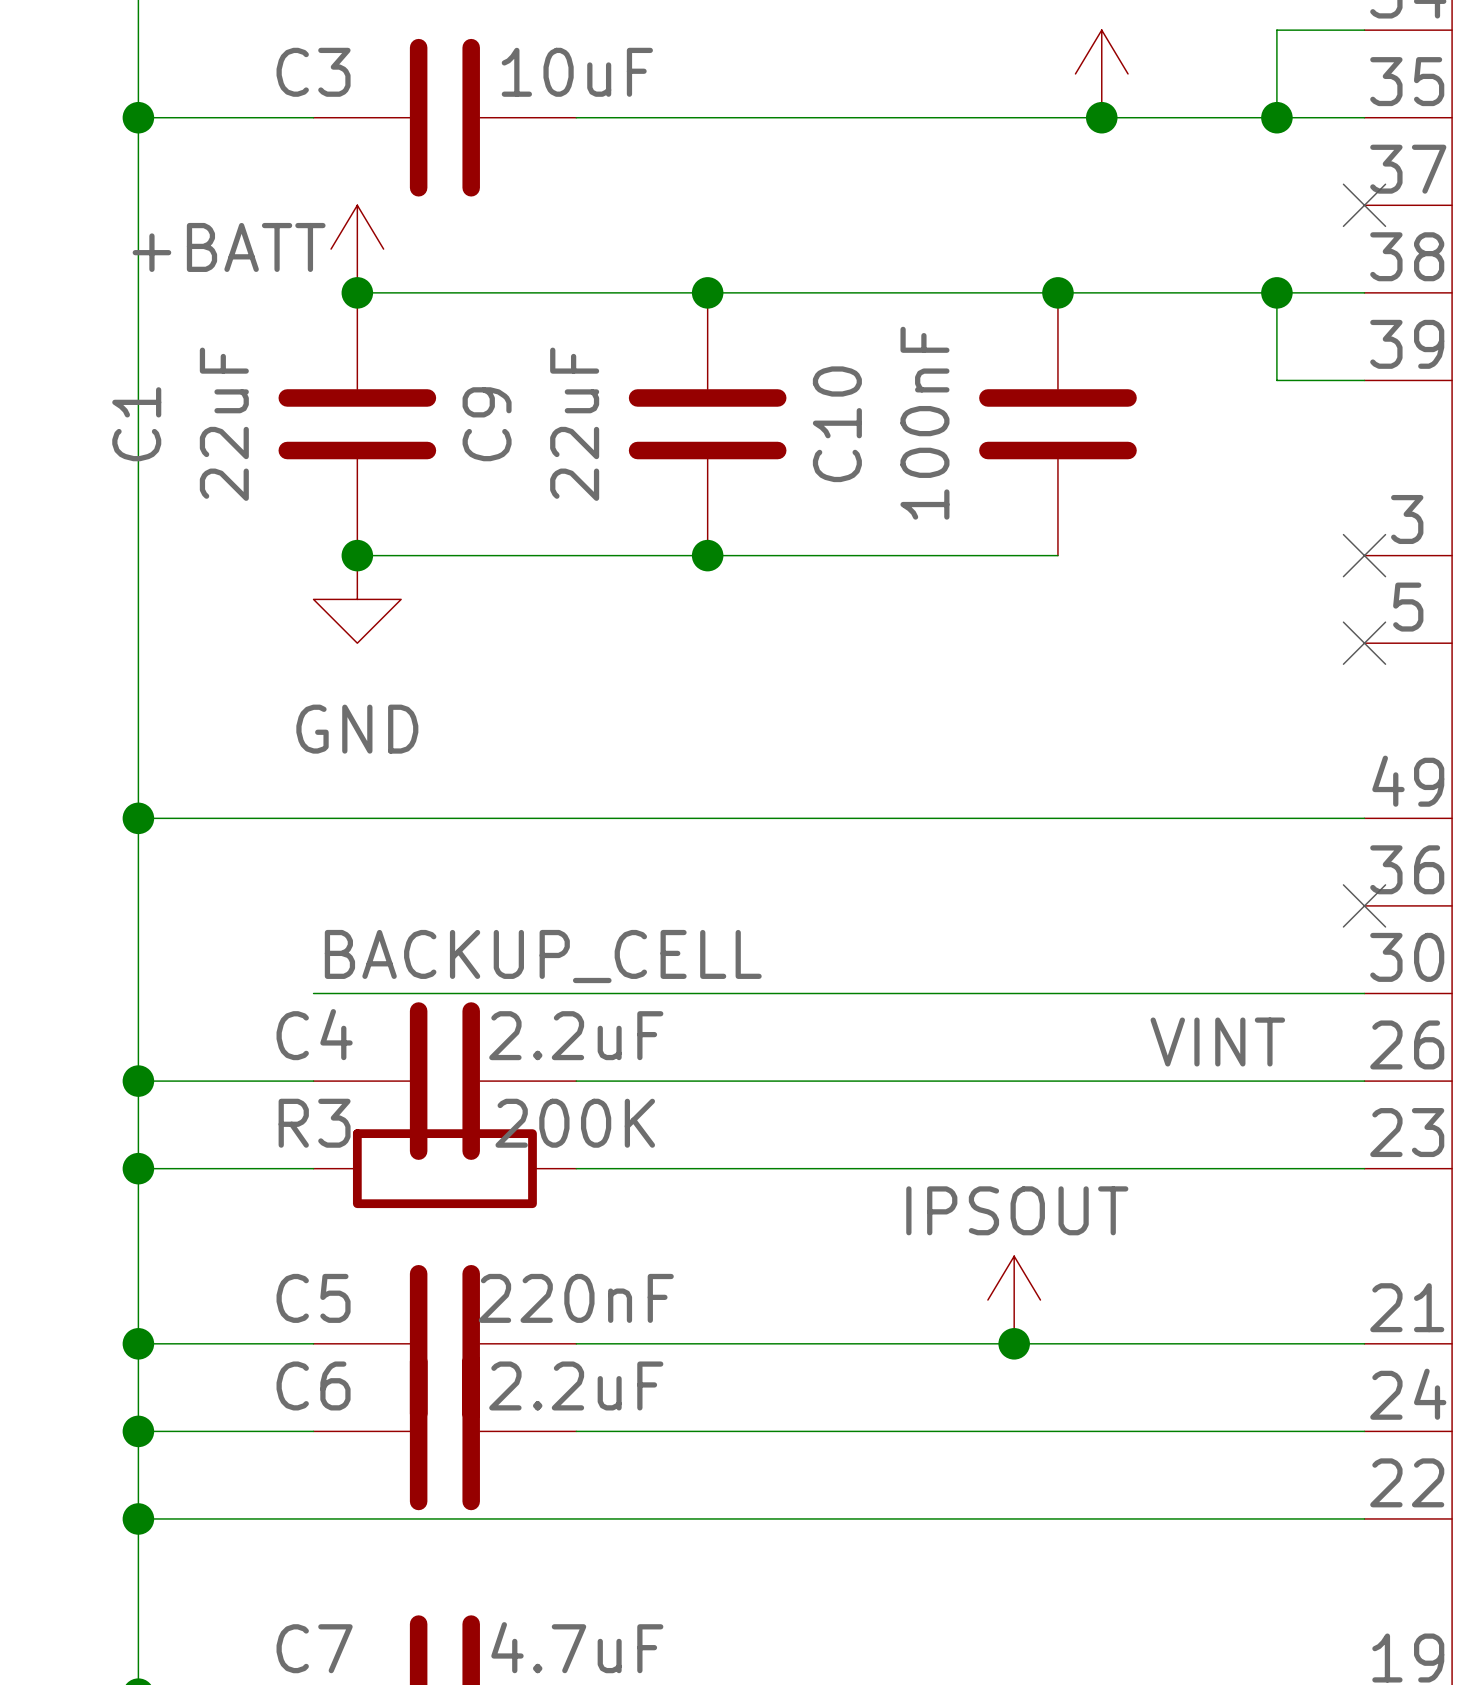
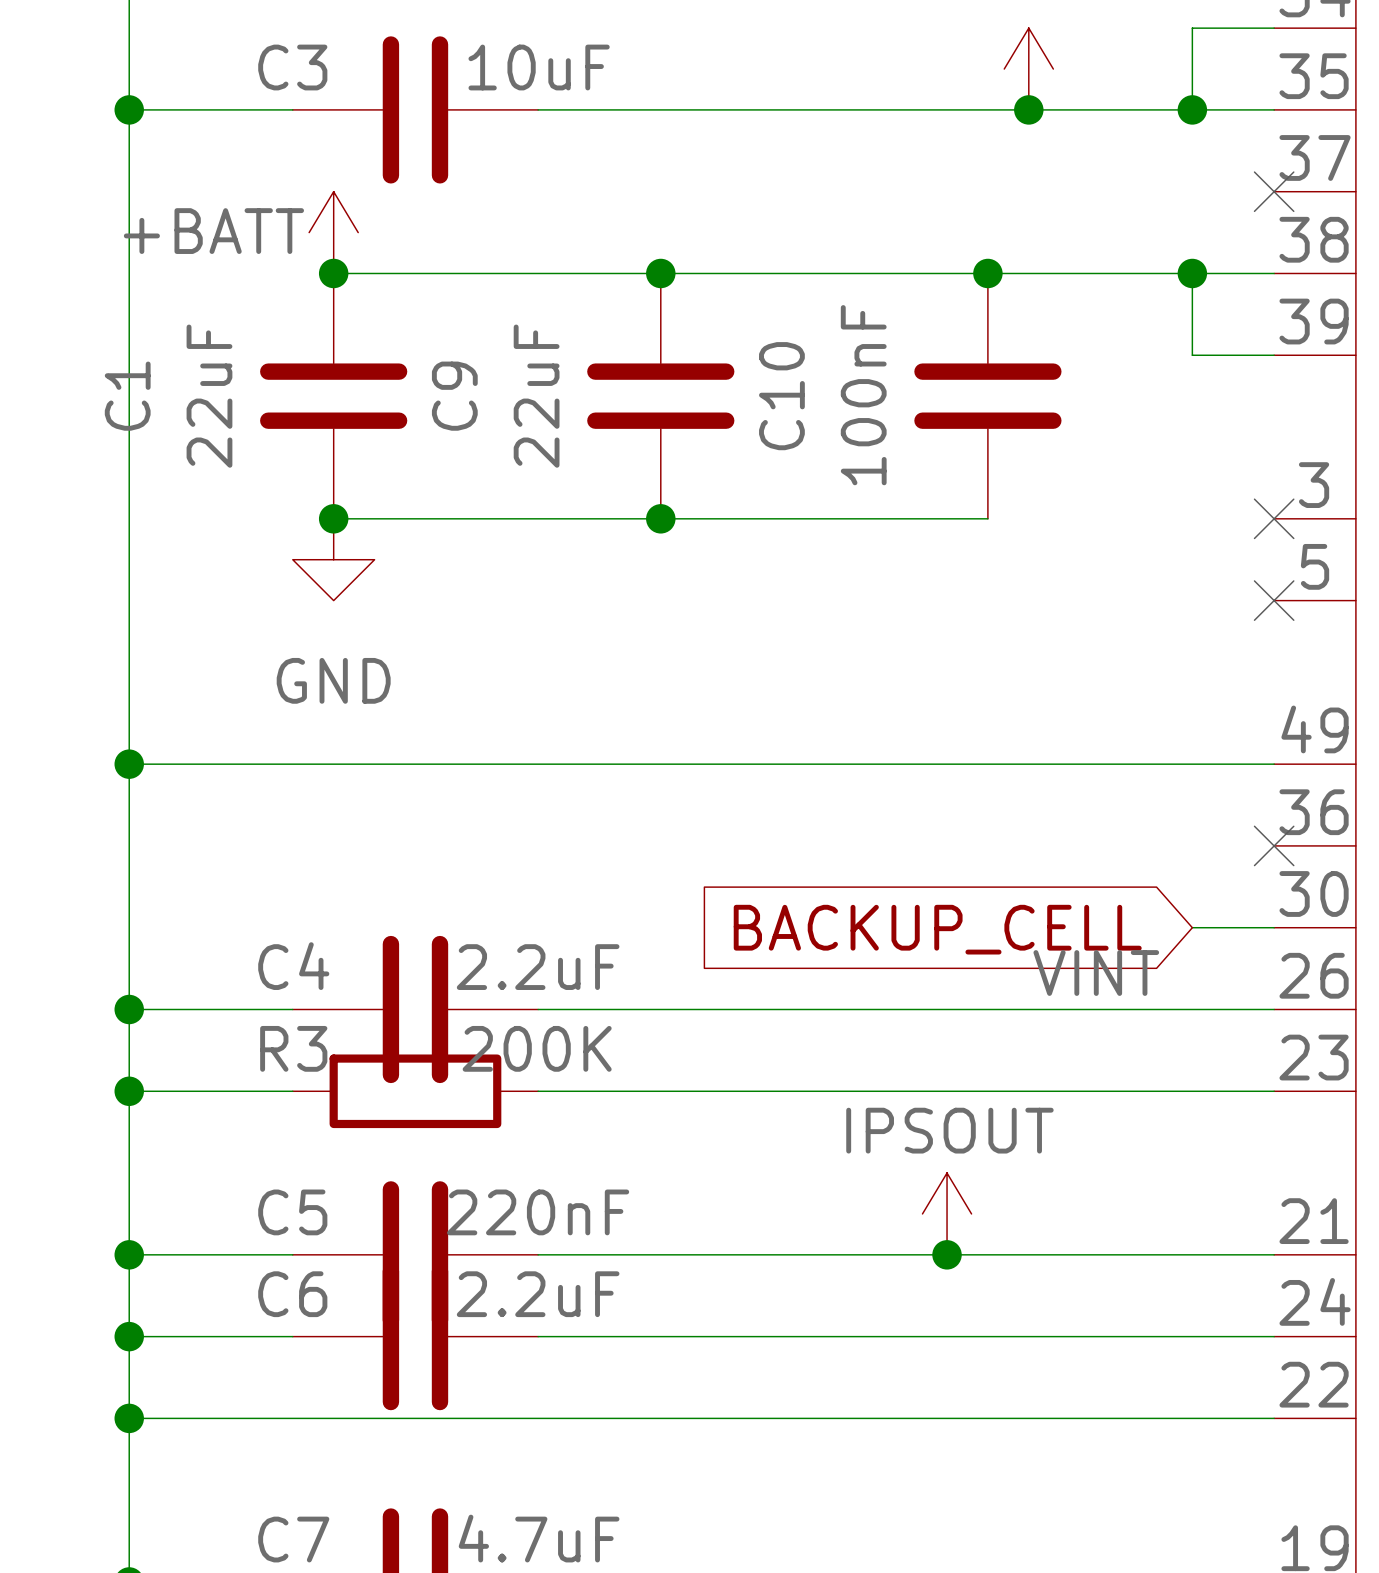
label: BACKUP_CELL (543, 956) -> none
wire: (313, 993) (1276, 993) -> none
global label: none -> BACKUP_CELL (937, 929)
label position: VINT (1217, 1042) -> VINT (1096, 973)

